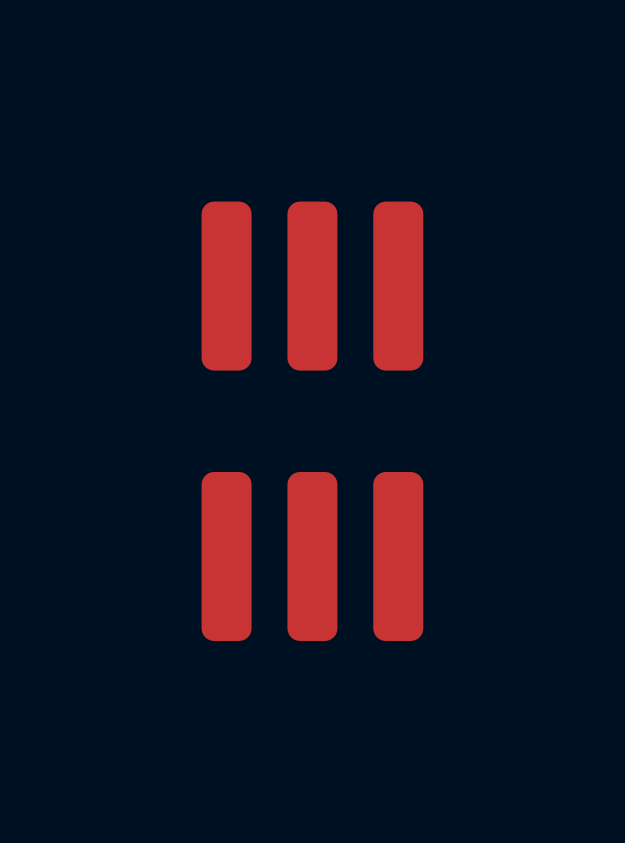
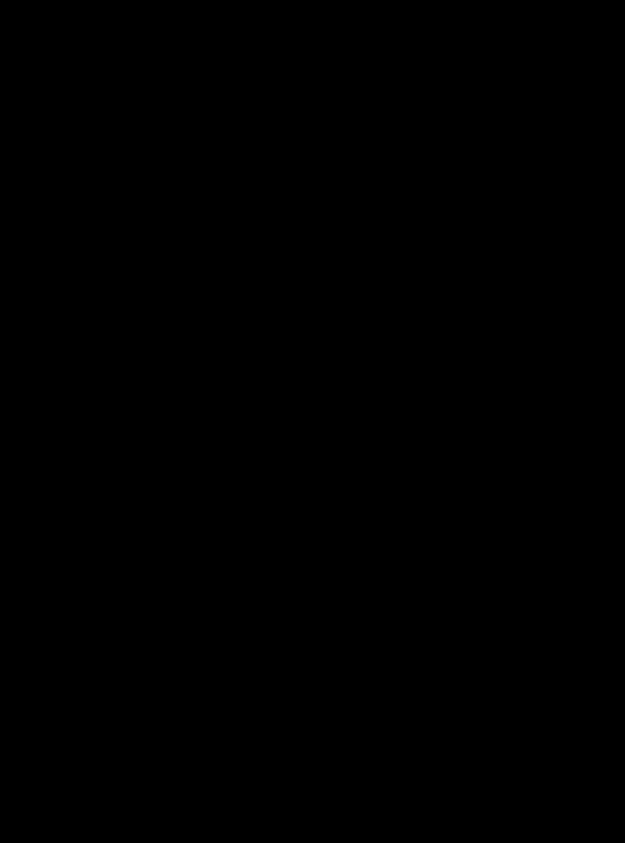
part: (312, 421) -> none

